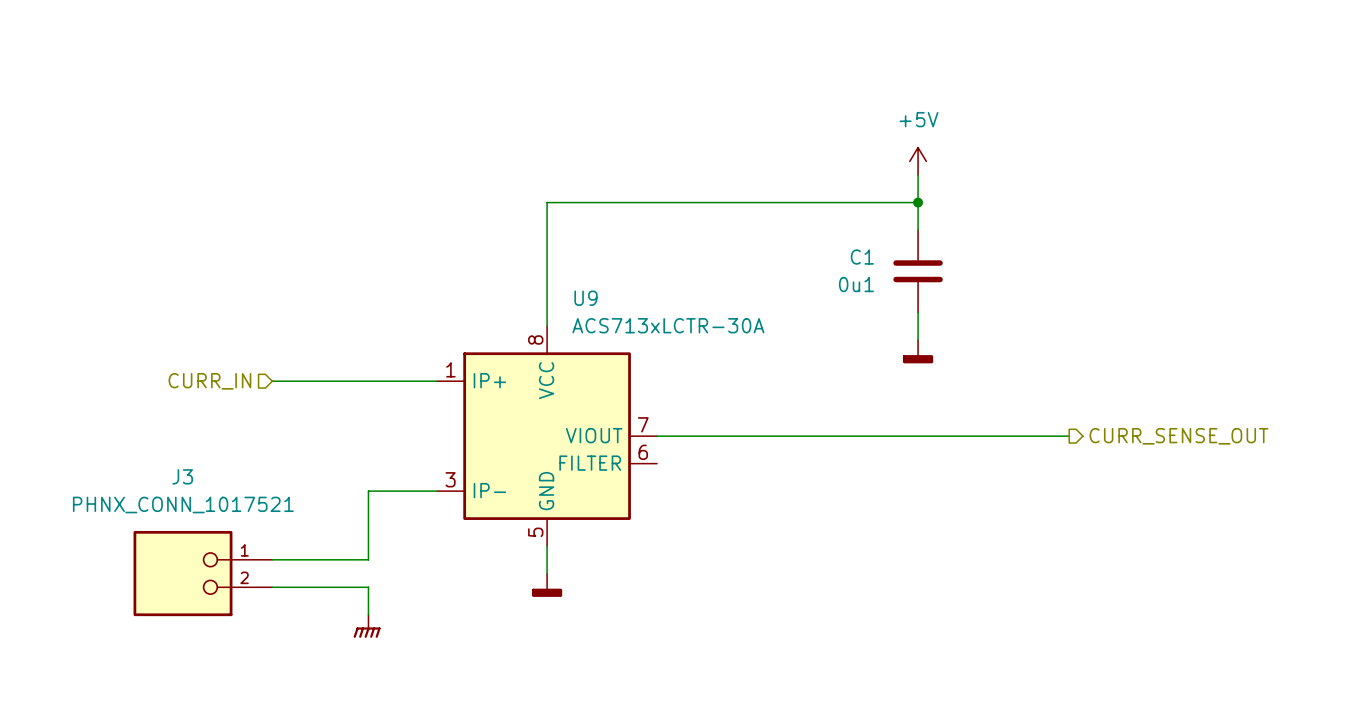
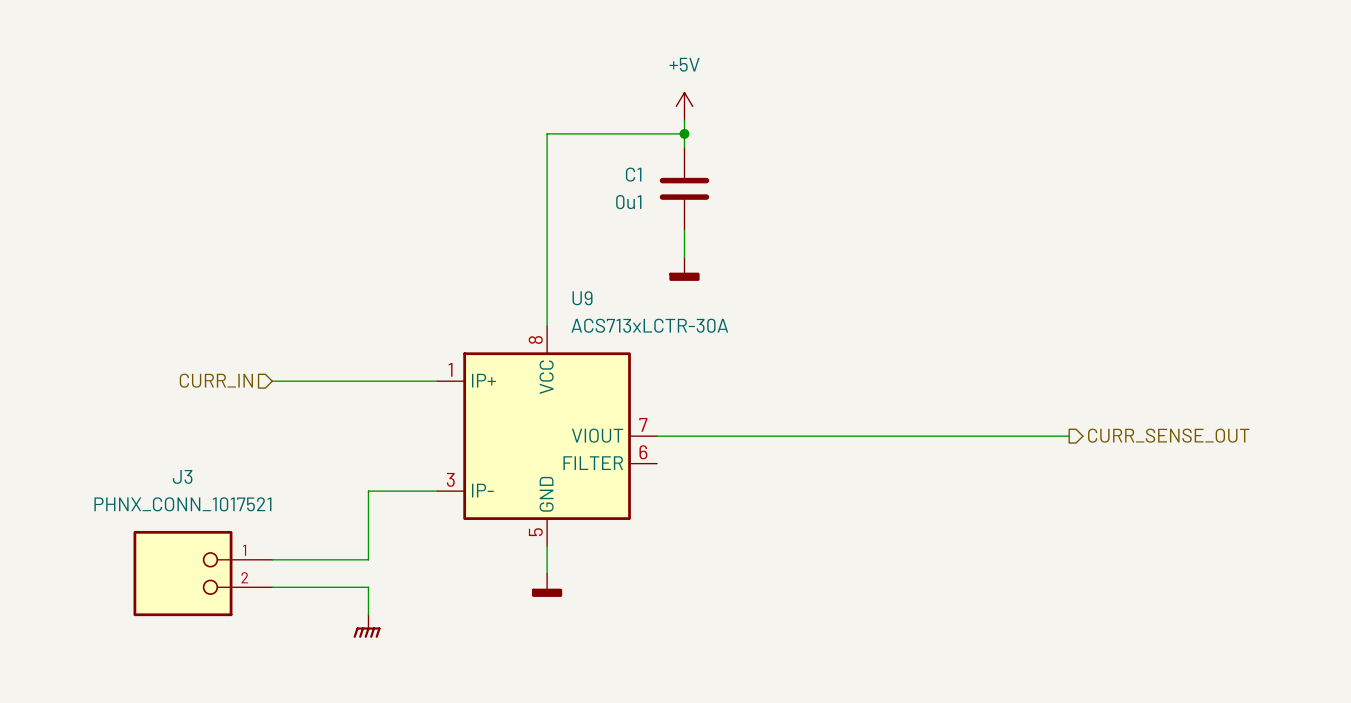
wire: none -> (684, 120) (684, 147)
junction: none -> (684, 133)
power symbol position: +5V (918, 161) -> +5V (684, 106)
wire: (918, 175) (918, 230) -> none
wire: (547, 202) (918, 202) -> (547, 202) (547, 133) (684, 133)
junction: (918, 202) -> none
C1 position: (918, 271) -> (684, 188)
wire: (918, 312) (918, 339) -> (684, 230) (684, 257)
power symbol position: (918, 351) -> (684, 269)

